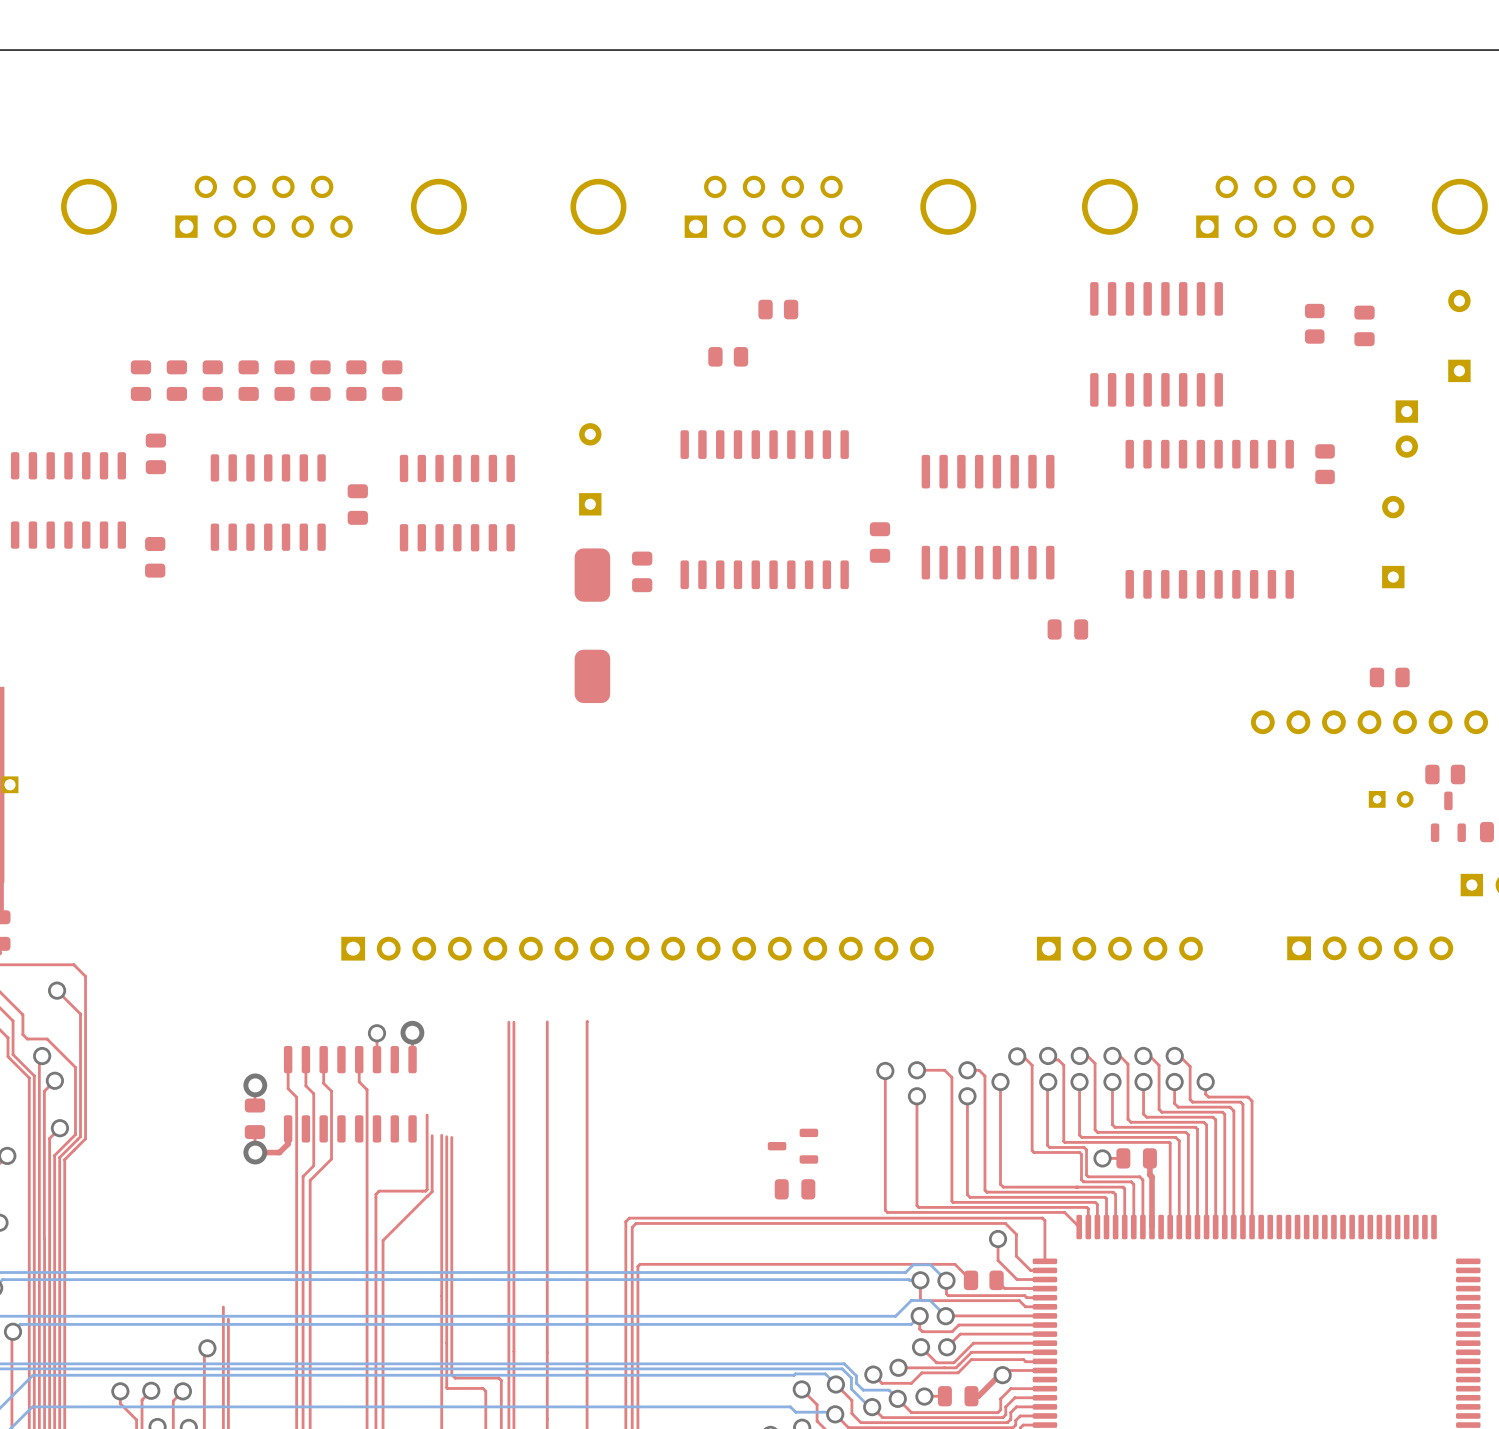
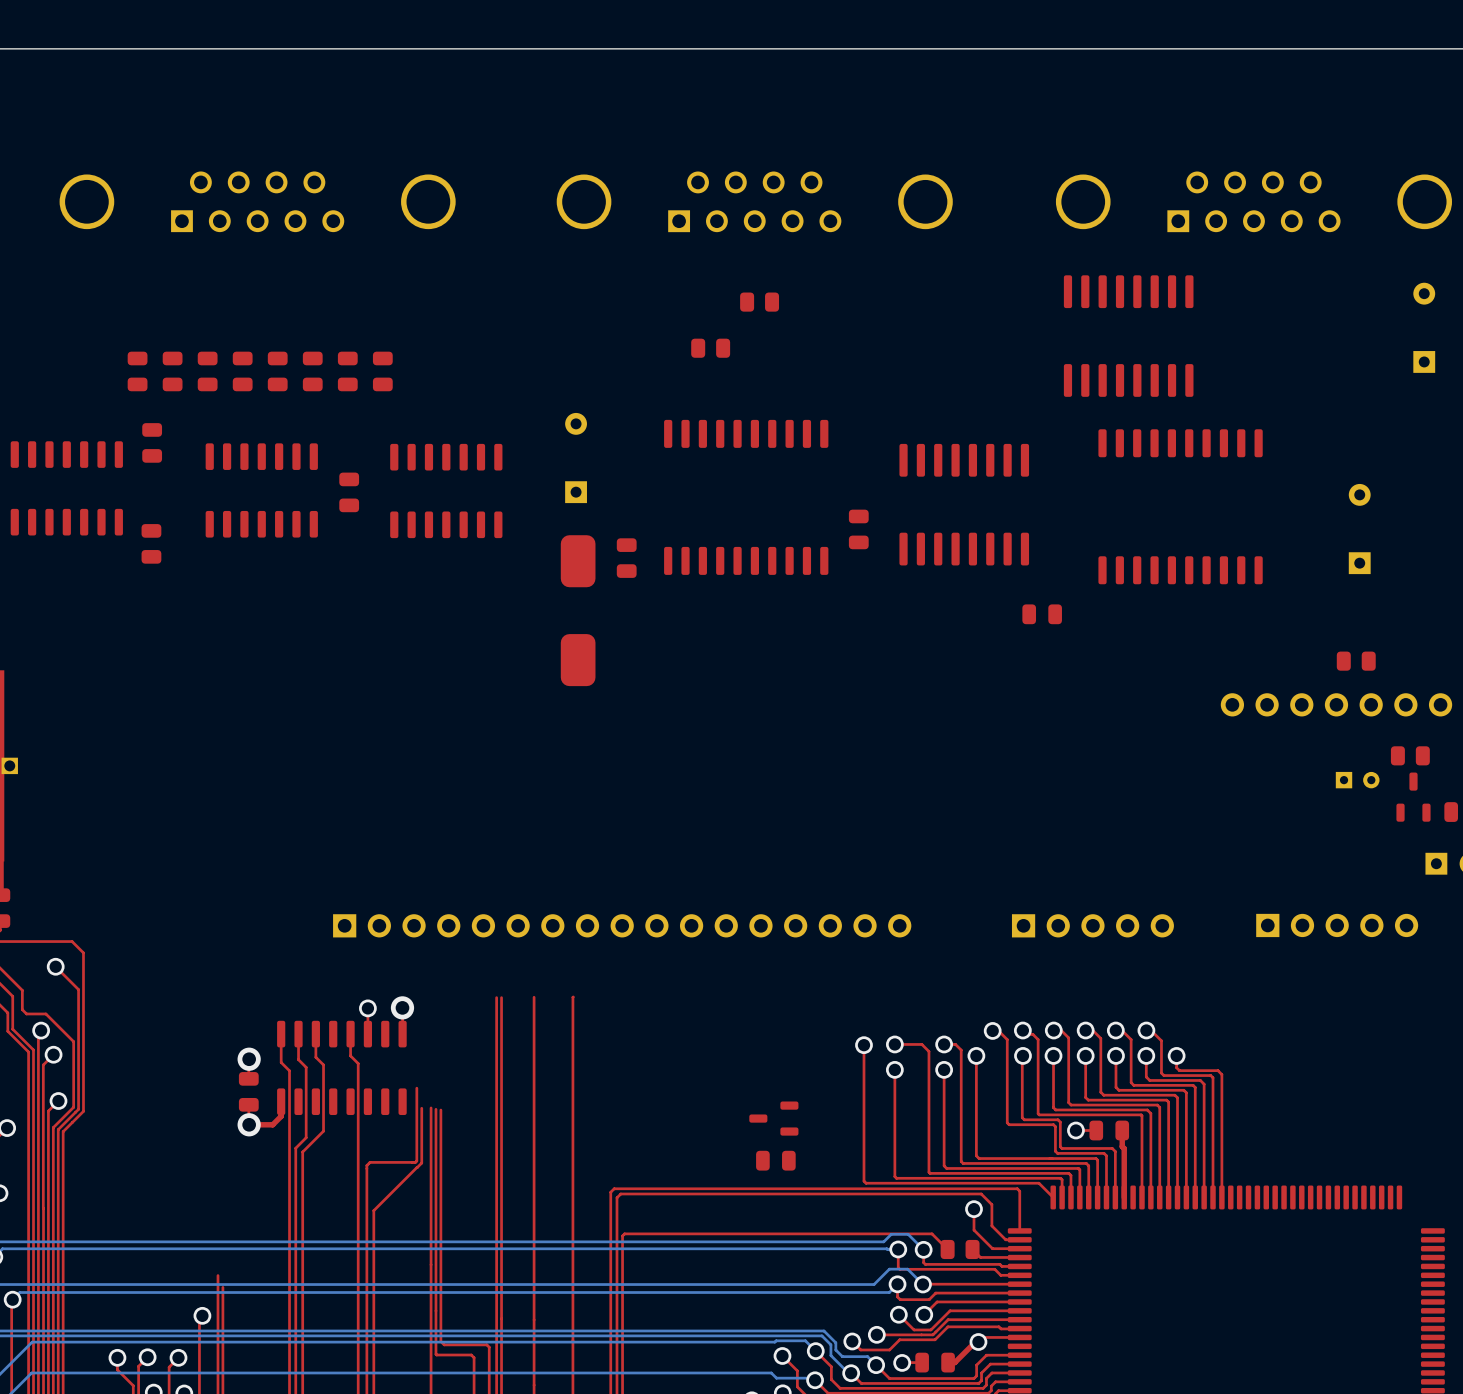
part: (1314, 323) -> none
part: (1364, 325) -> none
part: (1406, 429) -> none
part: (1325, 464) -> none

